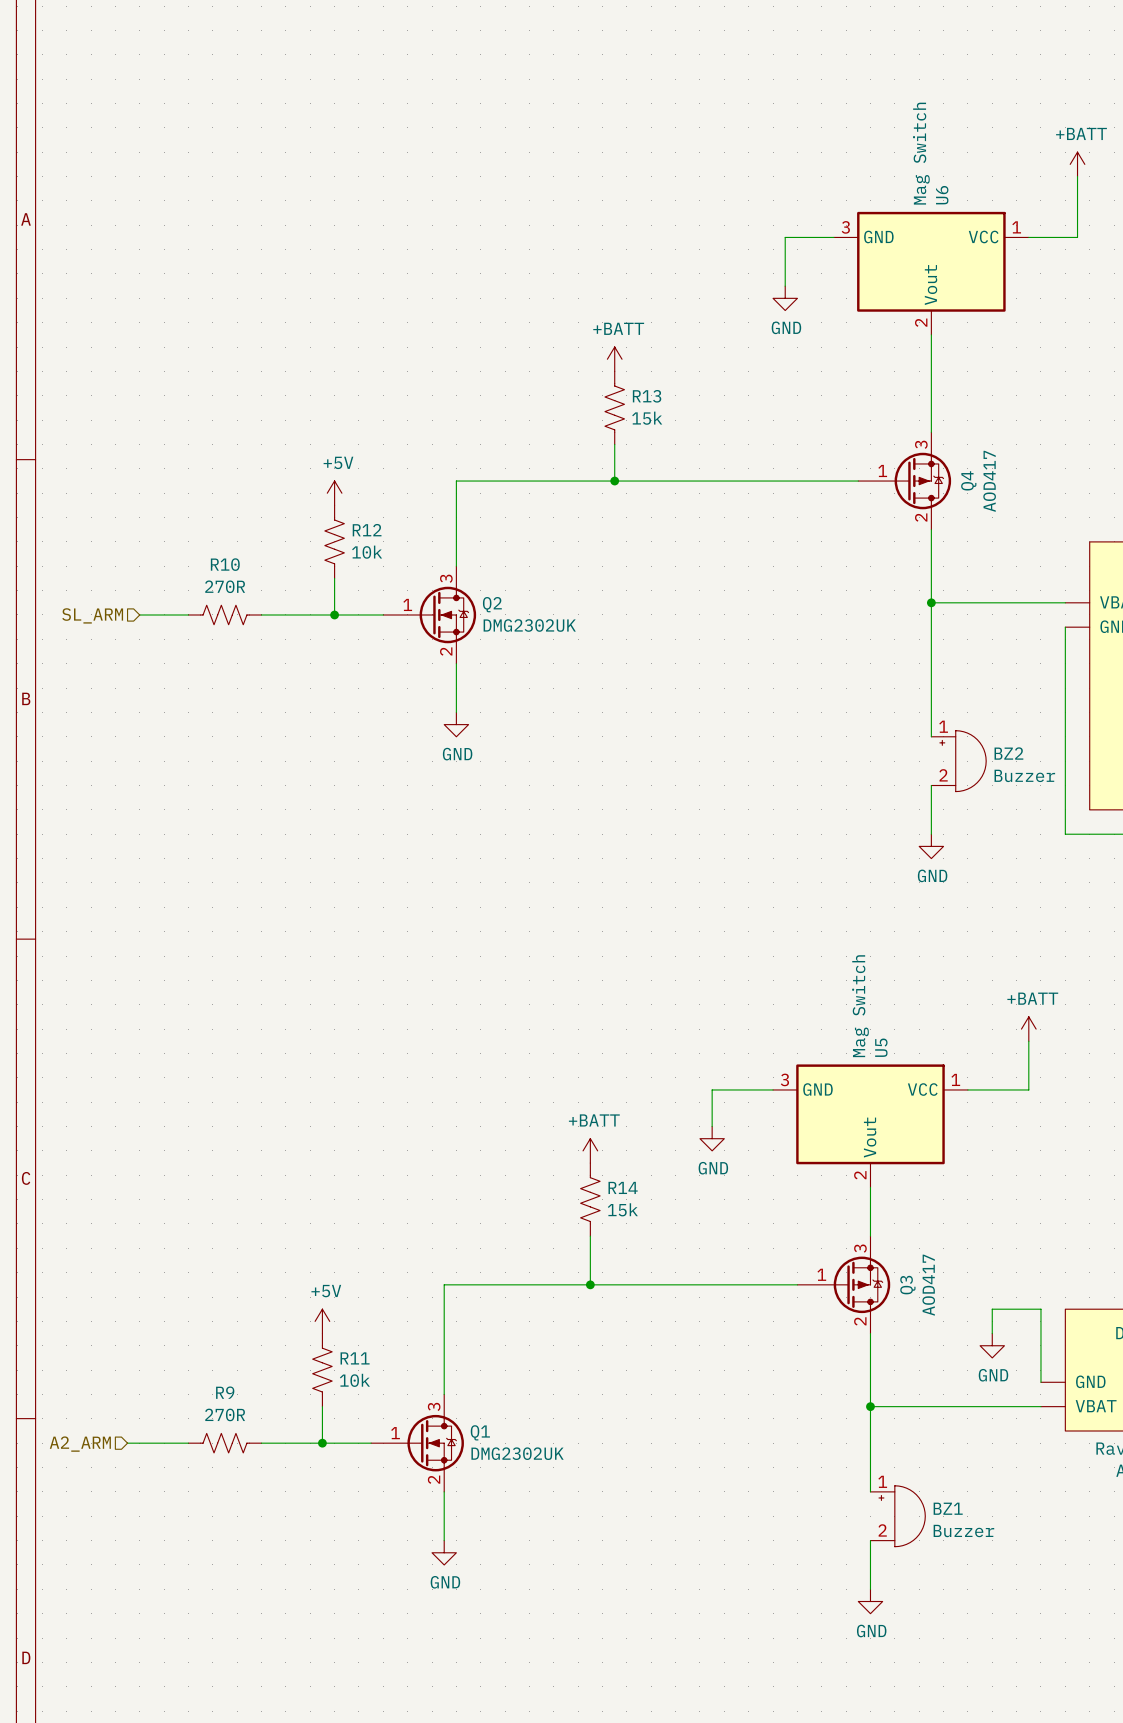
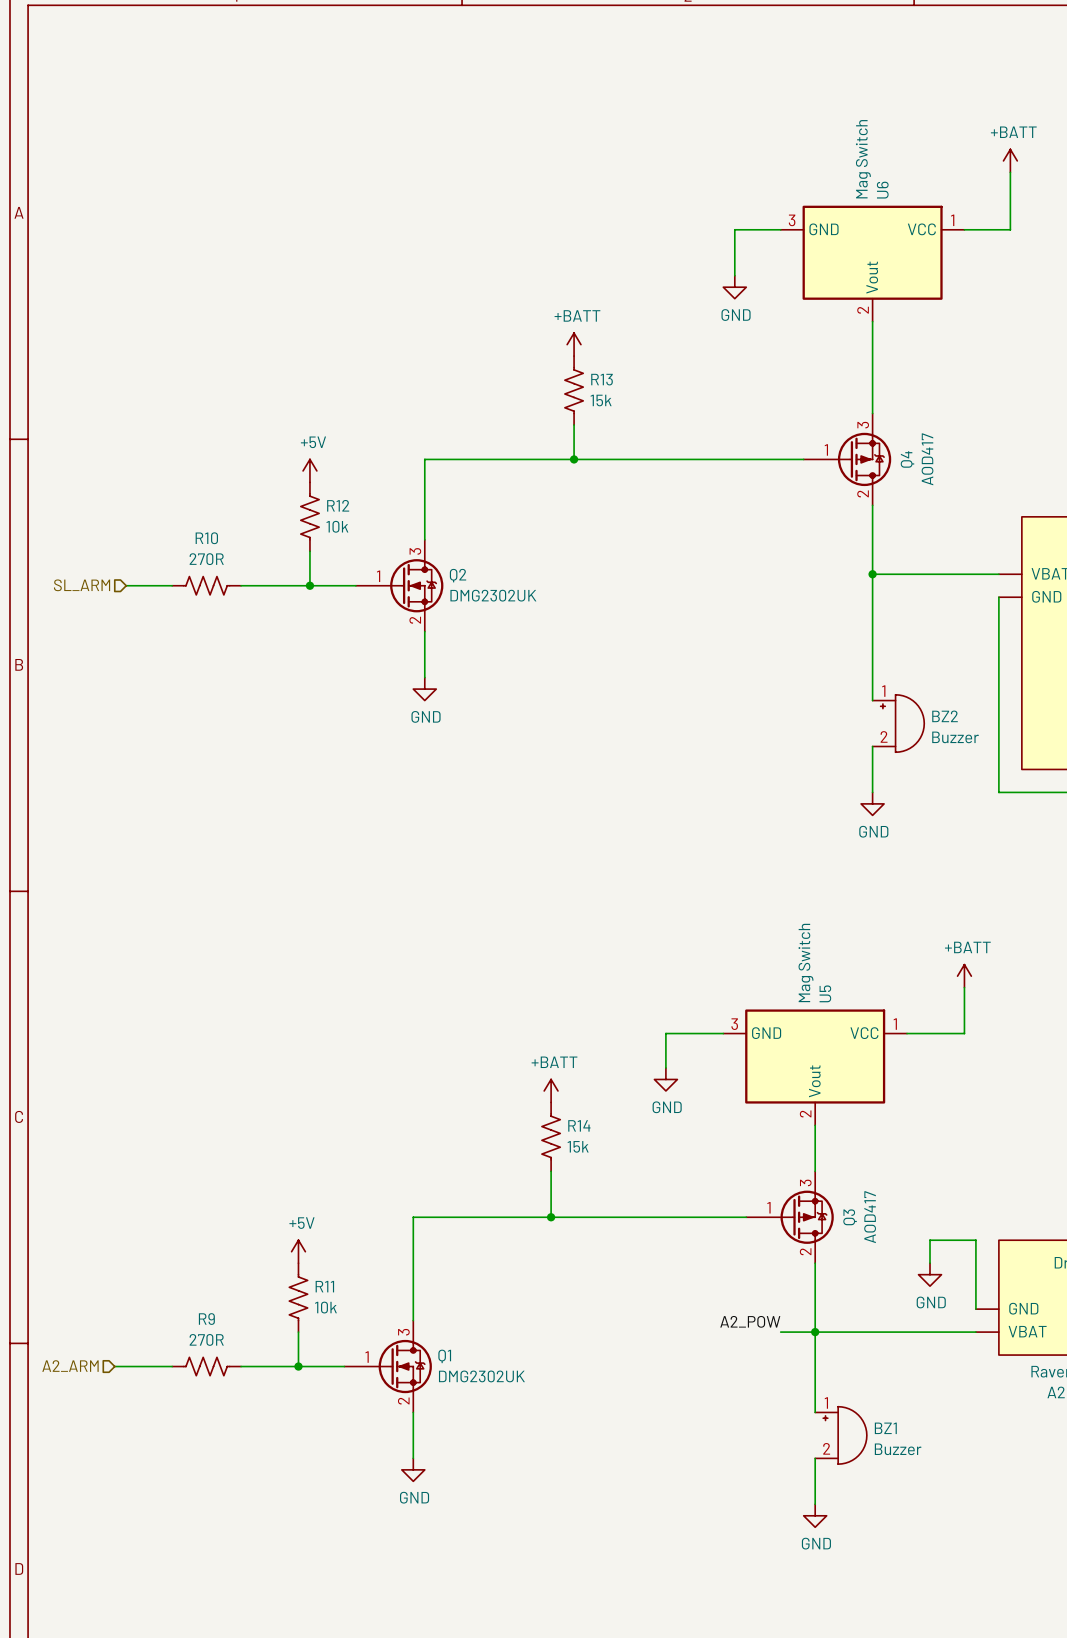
label: none -> A2_POW (750, 1321)
wire: none -> (780, 1332) (815, 1332)

